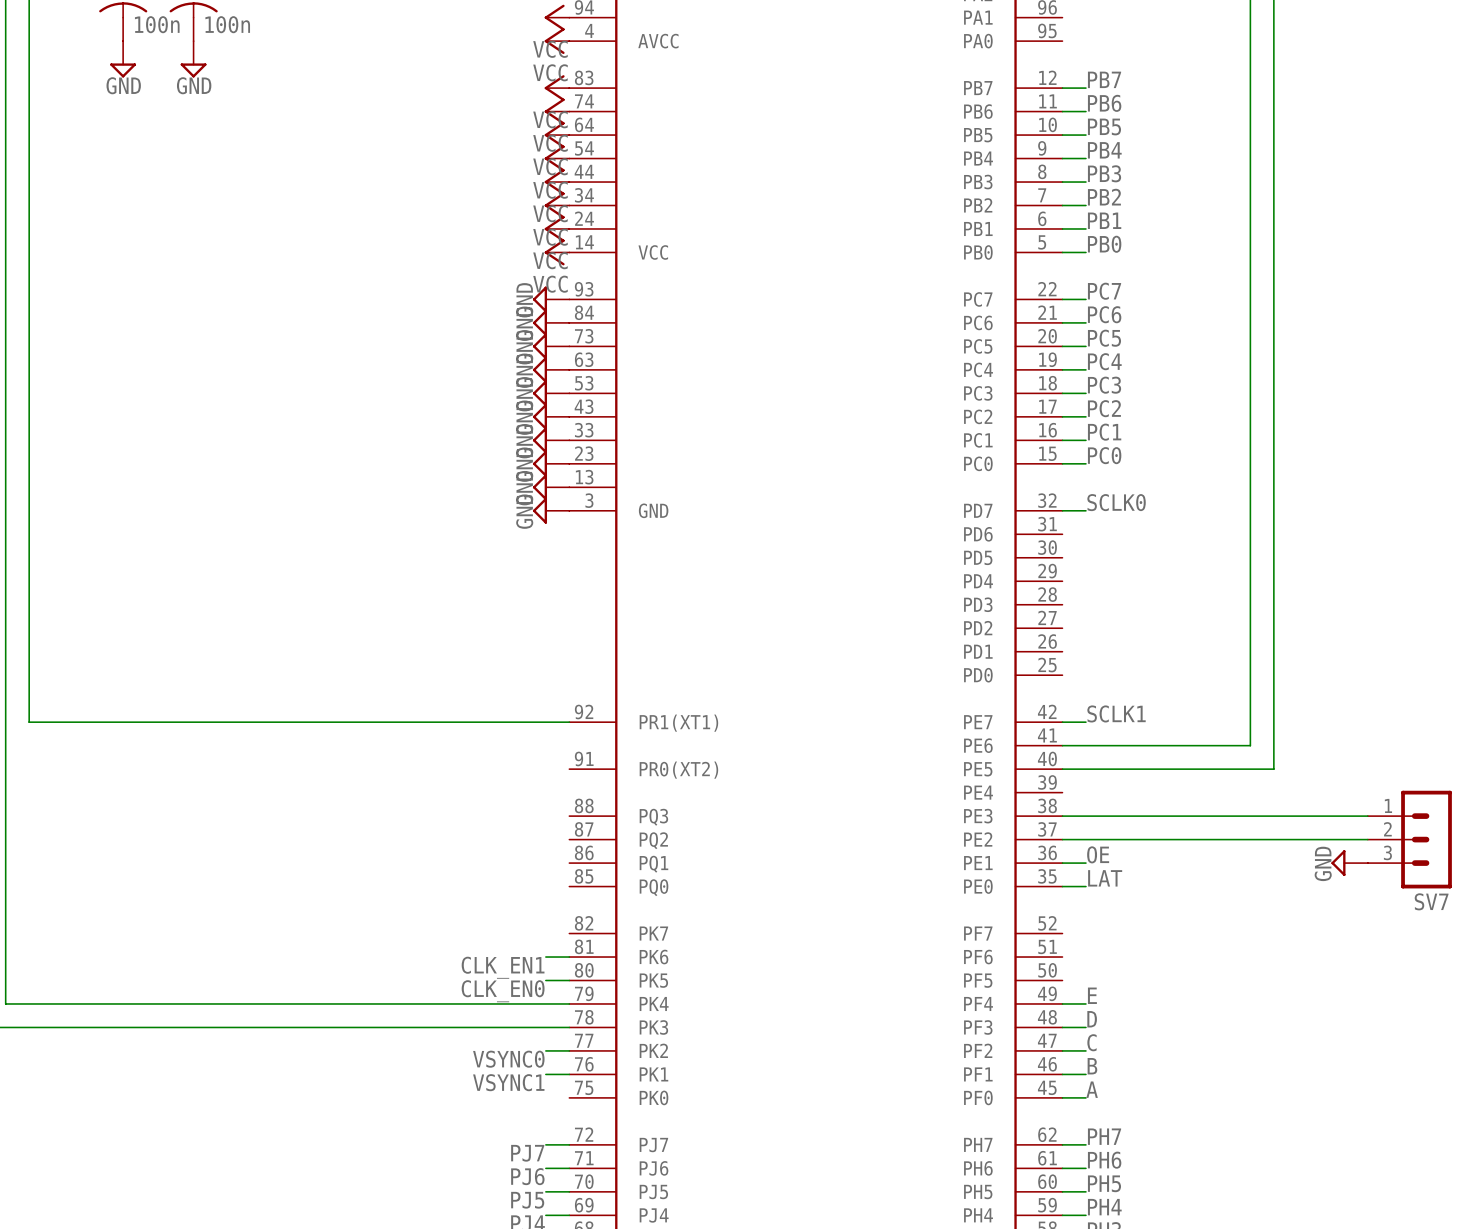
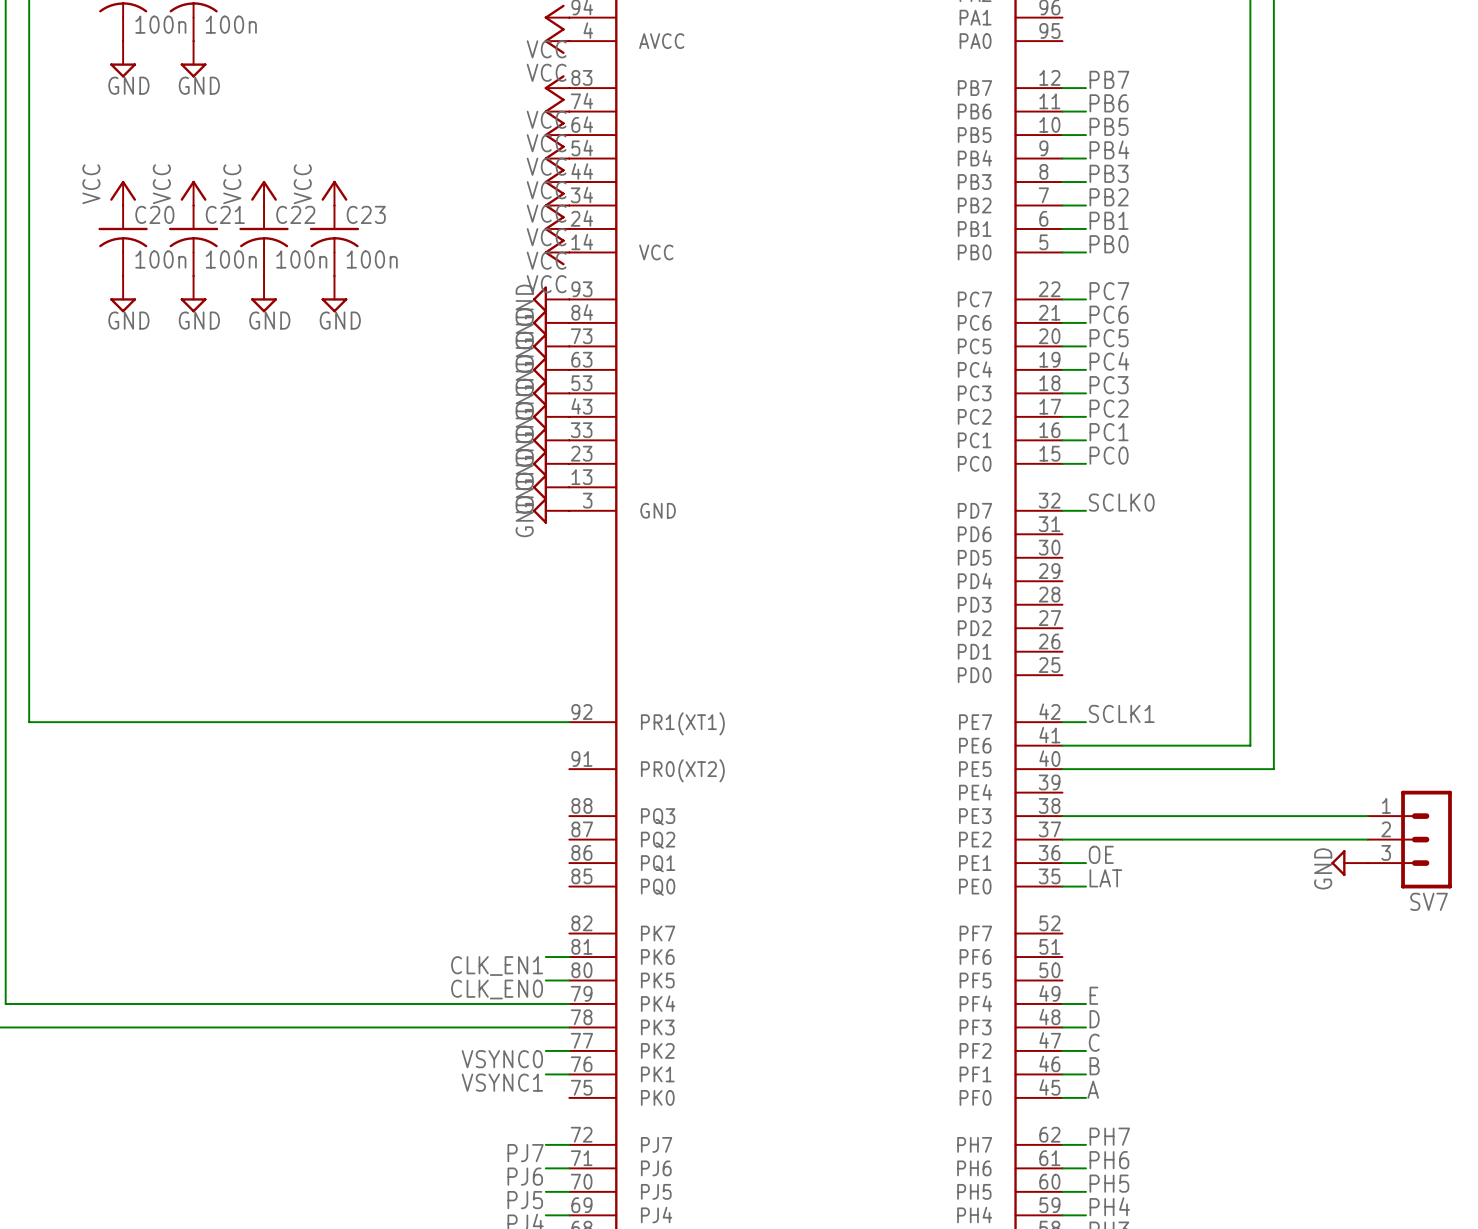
power symbol: none -> VCC (123, 193)
power symbol: none -> VCC (193, 193)
power symbol: none -> VCC (264, 193)
power symbol: none -> VCC (334, 193)
C20: none -> 100n (123, 240)
C21: none -> 100n (193, 240)
C22: none -> 100n (264, 240)
C23: none -> 100n (334, 240)
power symbol: none -> GND (123, 294)
power symbol: none -> GND (193, 294)
power symbol: none -> GND (264, 294)
power symbol: none -> GND (334, 294)

